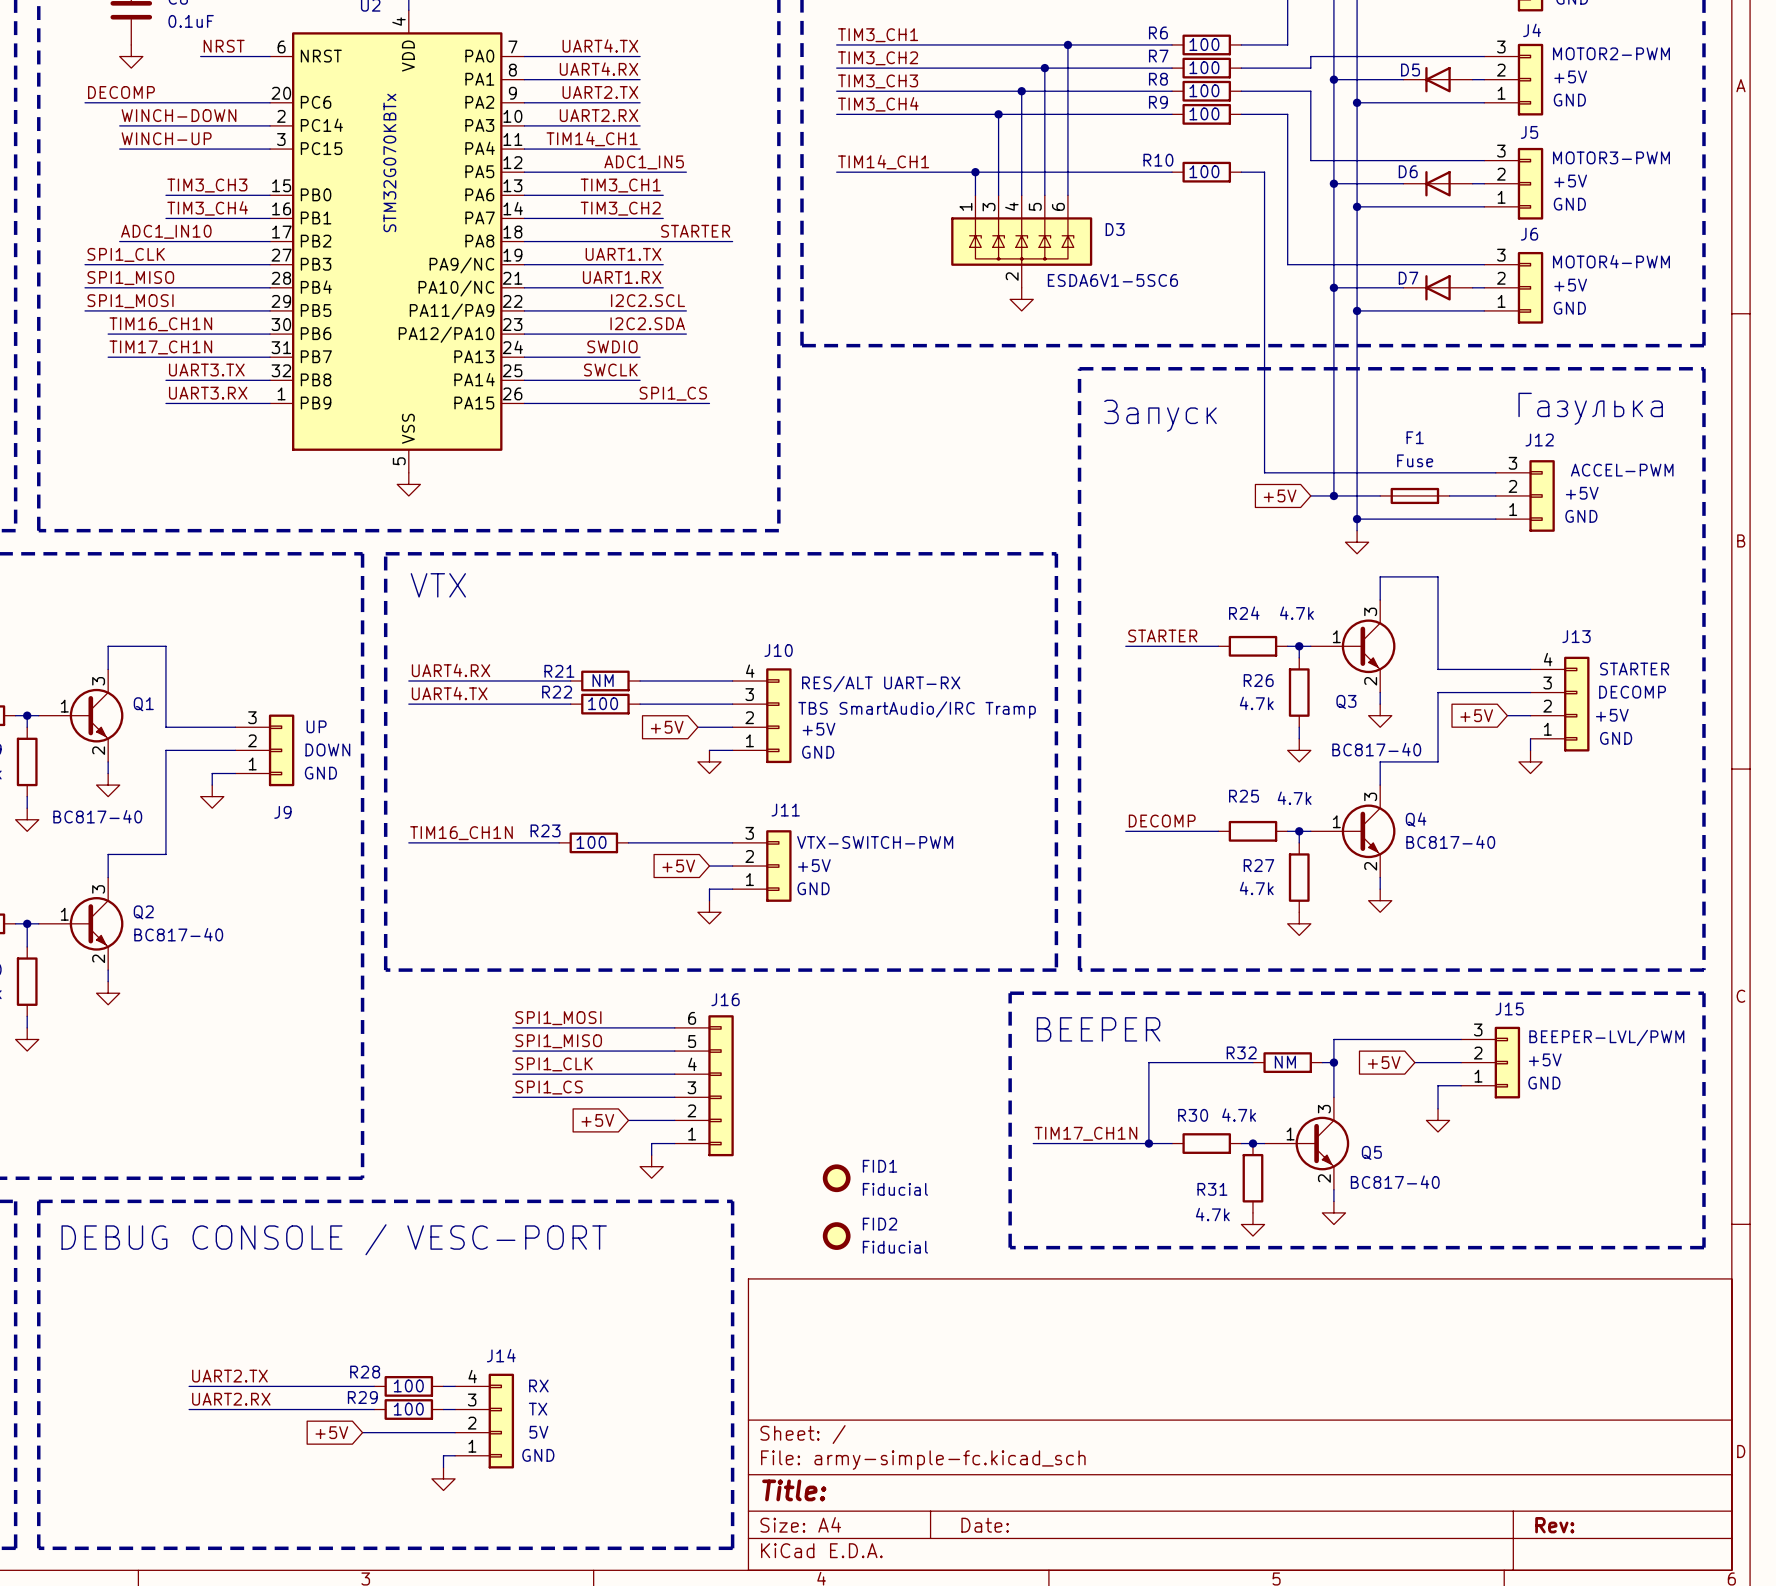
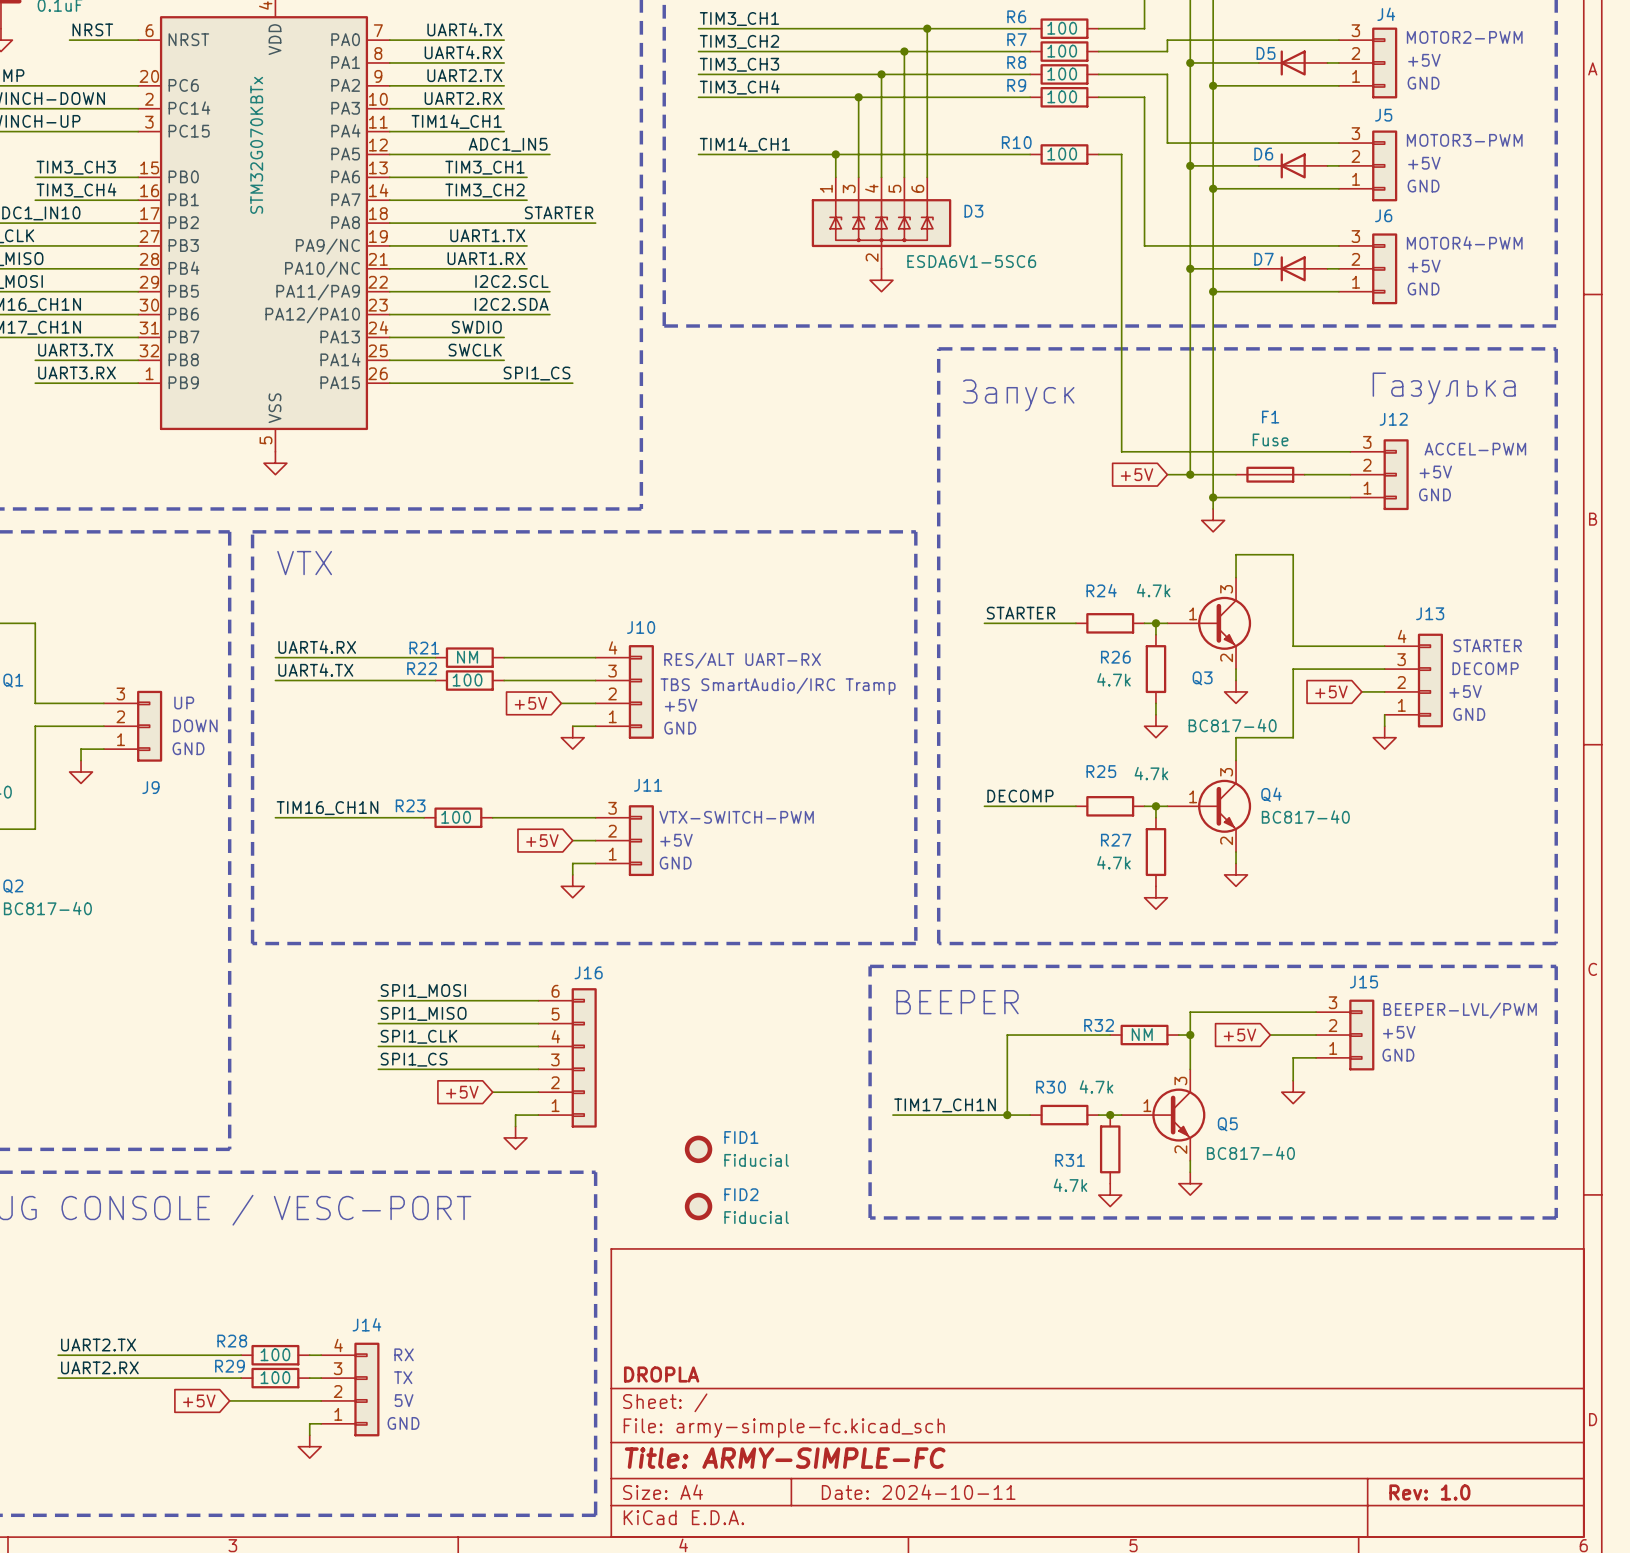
title block: none -> DROPLA (661, 1374)
title block: Title: (794, 1490) -> Title: ARMY-SIMPLE-FC (785, 1458)
title block: Date: (985, 1525) -> Date: 2024-10-11 (918, 1492)
title block: Rev: (1554, 1525) -> Rev: 1.0 (1429, 1492)

